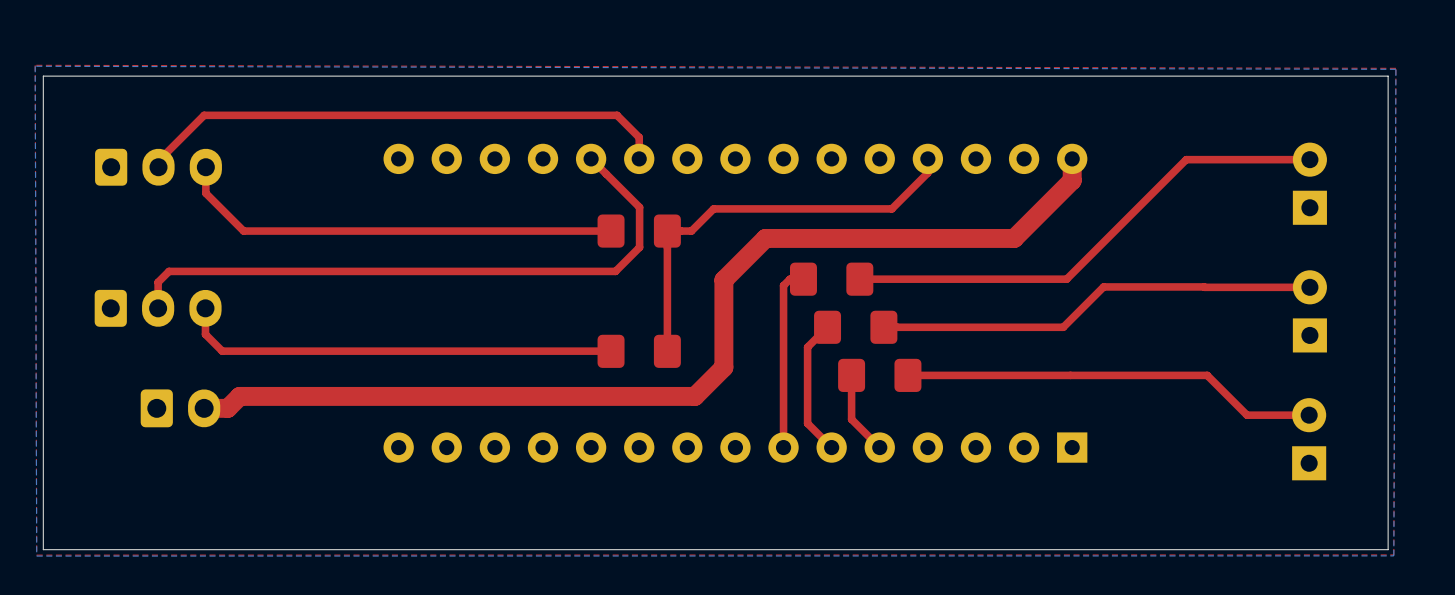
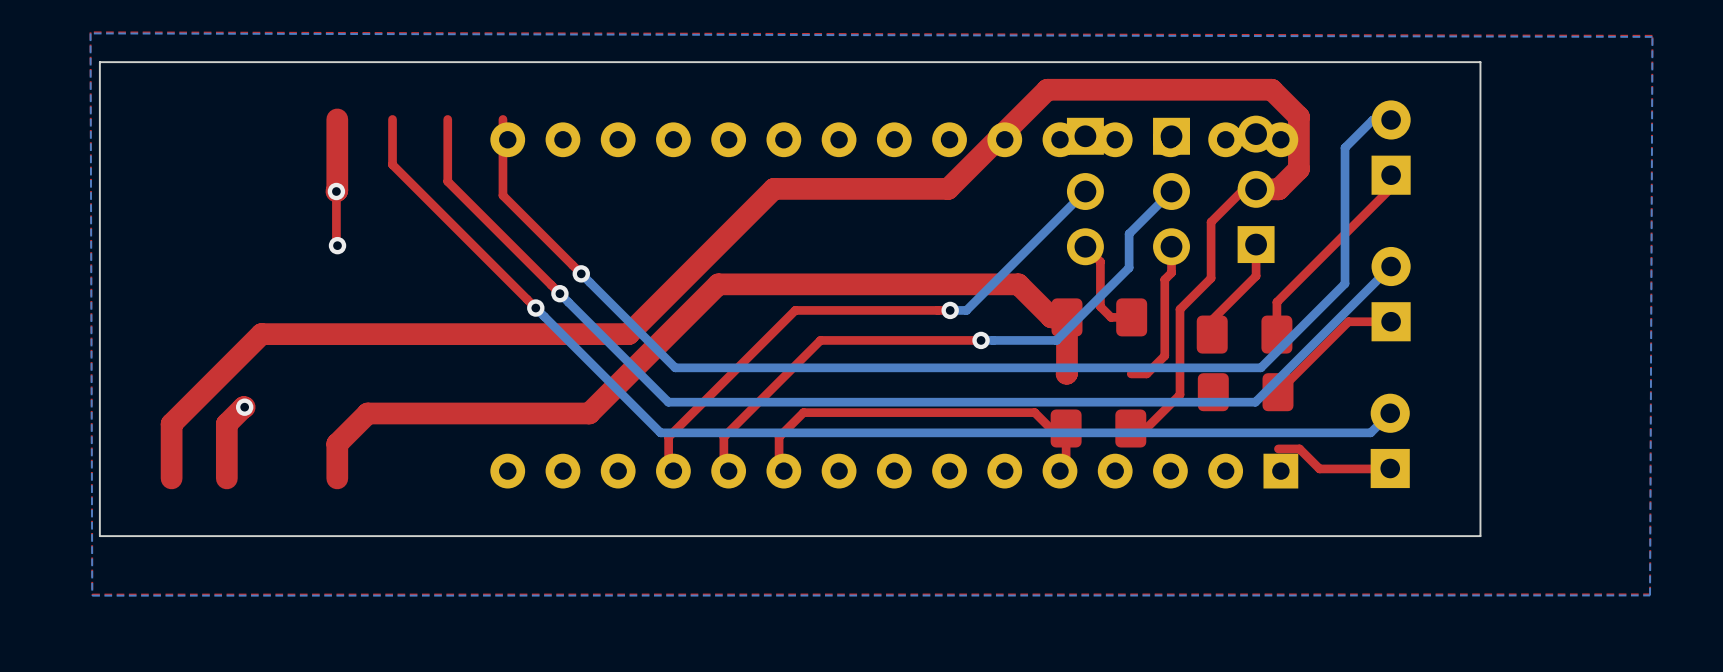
board edge: (43, 91) (43, 76) (1388, 76) (1388, 549) (43, 549) (43, 504) -> (99, 62) (1480, 62) (1480, 536) (99, 536)
top track: none -> (337, 119) (337, 245)
top track: none -> (392, 119) (392, 164) (535, 308)
top track: none -> (447, 119) (447, 181) (559, 293)
top track: none -> (502, 119) (502, 195) (581, 273)
bottom track: none -> (1391, 119) (1372, 119) (1345, 147) (1345, 283) (1260, 367) (675, 367) (581, 273)
top track: (591, 158) (639, 207) (639, 247) (615, 271) (169, 271) (158, 282) (158, 308) -> none
top track: (639, 158) (639, 137) (617, 115) (204, 115) (158, 160) (158, 167) -> none
top track: (927, 158) (927, 172) (891, 208) (713, 208) (691, 231) (667, 231) (667, 351) -> none
top track: (1072, 158) (1072, 180) (1014, 238) (765, 238) (723, 280) (723, 367) (694, 396) (239, 396) (227, 408) (204, 408) -> none
top track: (1309, 159) (1186, 159) (1066, 279) (859, 279) -> none
part: none -> (1391, 147)
part: (158, 167) -> none
top track: (205, 167) (205, 193) (243, 231) (611, 231) -> none
part: (1309, 183) -> none
top track: none -> (1391, 175) (1391, 188) (1276, 302) (1276, 334)
part: none -> (1256, 189)
via: none -> (336, 191)
bottom track: none -> (1085, 191) (966, 310) (950, 310)
part: none -> (1085, 191)
bottom track: none -> (1171, 191) (1129, 233) (1129, 267) (1056, 340) (981, 340)
part: none -> (1171, 191)
part: (639, 231) -> none
top track: none -> (1256, 244) (1256, 276) (1212, 319) (1212, 334)
via: none -> (337, 245)
top track: none -> (1085, 246) (1100, 261) (1100, 306) (1111, 317) (1131, 317)
top track: none -> (1171, 246) (1171, 272) (1164, 279) (1164, 355) (1146, 373) (1131, 373)
bottom track: none -> (1391, 266) (1255, 402) (668, 402) (559, 293)
via: none -> (581, 273)
top track: (803, 279) (789, 279) (783, 285) (783, 447) -> none
part: (831, 279) -> none
top track: (1309, 287) (1103, 286) (1063, 327) (883, 327) -> none
via: none -> (559, 293)
part: none -> (1391, 294)
bottom track: none -> (535, 308) (660, 432) (1370, 432) (1390, 413)
via: none -> (535, 308)
top track: none -> (950, 310) (795, 310) (668, 437) (668, 478)
via: none -> (950, 310)
part: (158, 308) -> none
top track: (205, 308) (205, 334) (222, 351) (610, 351) -> none
part: (1309, 311) -> none
part: none -> (1099, 317)
top track: none -> (1391, 321) (1348, 321) (1277, 392)
top track: (827, 327) (807, 347) (807, 423) (831, 447) -> none
part: (855, 327) -> none
part: none -> (1244, 334)
top track: none -> (981, 340) (820, 340) (723, 437) (723, 478)
via: none -> (981, 340)
part: (639, 351) -> none
top track: none -> (1066, 373) (1066, 317) (1051, 317) (1018, 284) (718, 284) (589, 413) (367, 413) (337, 443) (337, 478)
top track: (851, 375) (851, 419) (879, 447) -> none
part: (879, 375) -> none
top track: (907, 375) (1207, 375) (1247, 415) (1309, 415) -> none
part: none -> (1245, 392)
top track: none -> (244, 407) (226, 424) (226, 478)
via: none -> (244, 407)
part: (180, 408) -> none
part: none -> (1098, 428)
top track: none -> (1130, 428) (1146, 428) (1179, 394) (1179, 309) (1211, 278) (1211, 222) (1243, 189) (1278, 189) (1298, 169) (1298, 116) (1271, 89) (1047, 89) (948, 188) (773, 188) (628, 334) (261, 334) (171, 424) (171, 478)
part: none -> (1390, 440)
top track: none -> (1278, 448) (1299, 448) (1319, 468) (1390, 468)
part: (1309, 439) -> none
top track: none -> (779, 478) (779, 437) (803, 412) (1034, 412) (1050, 428) (1066, 428) (1065, 482)

